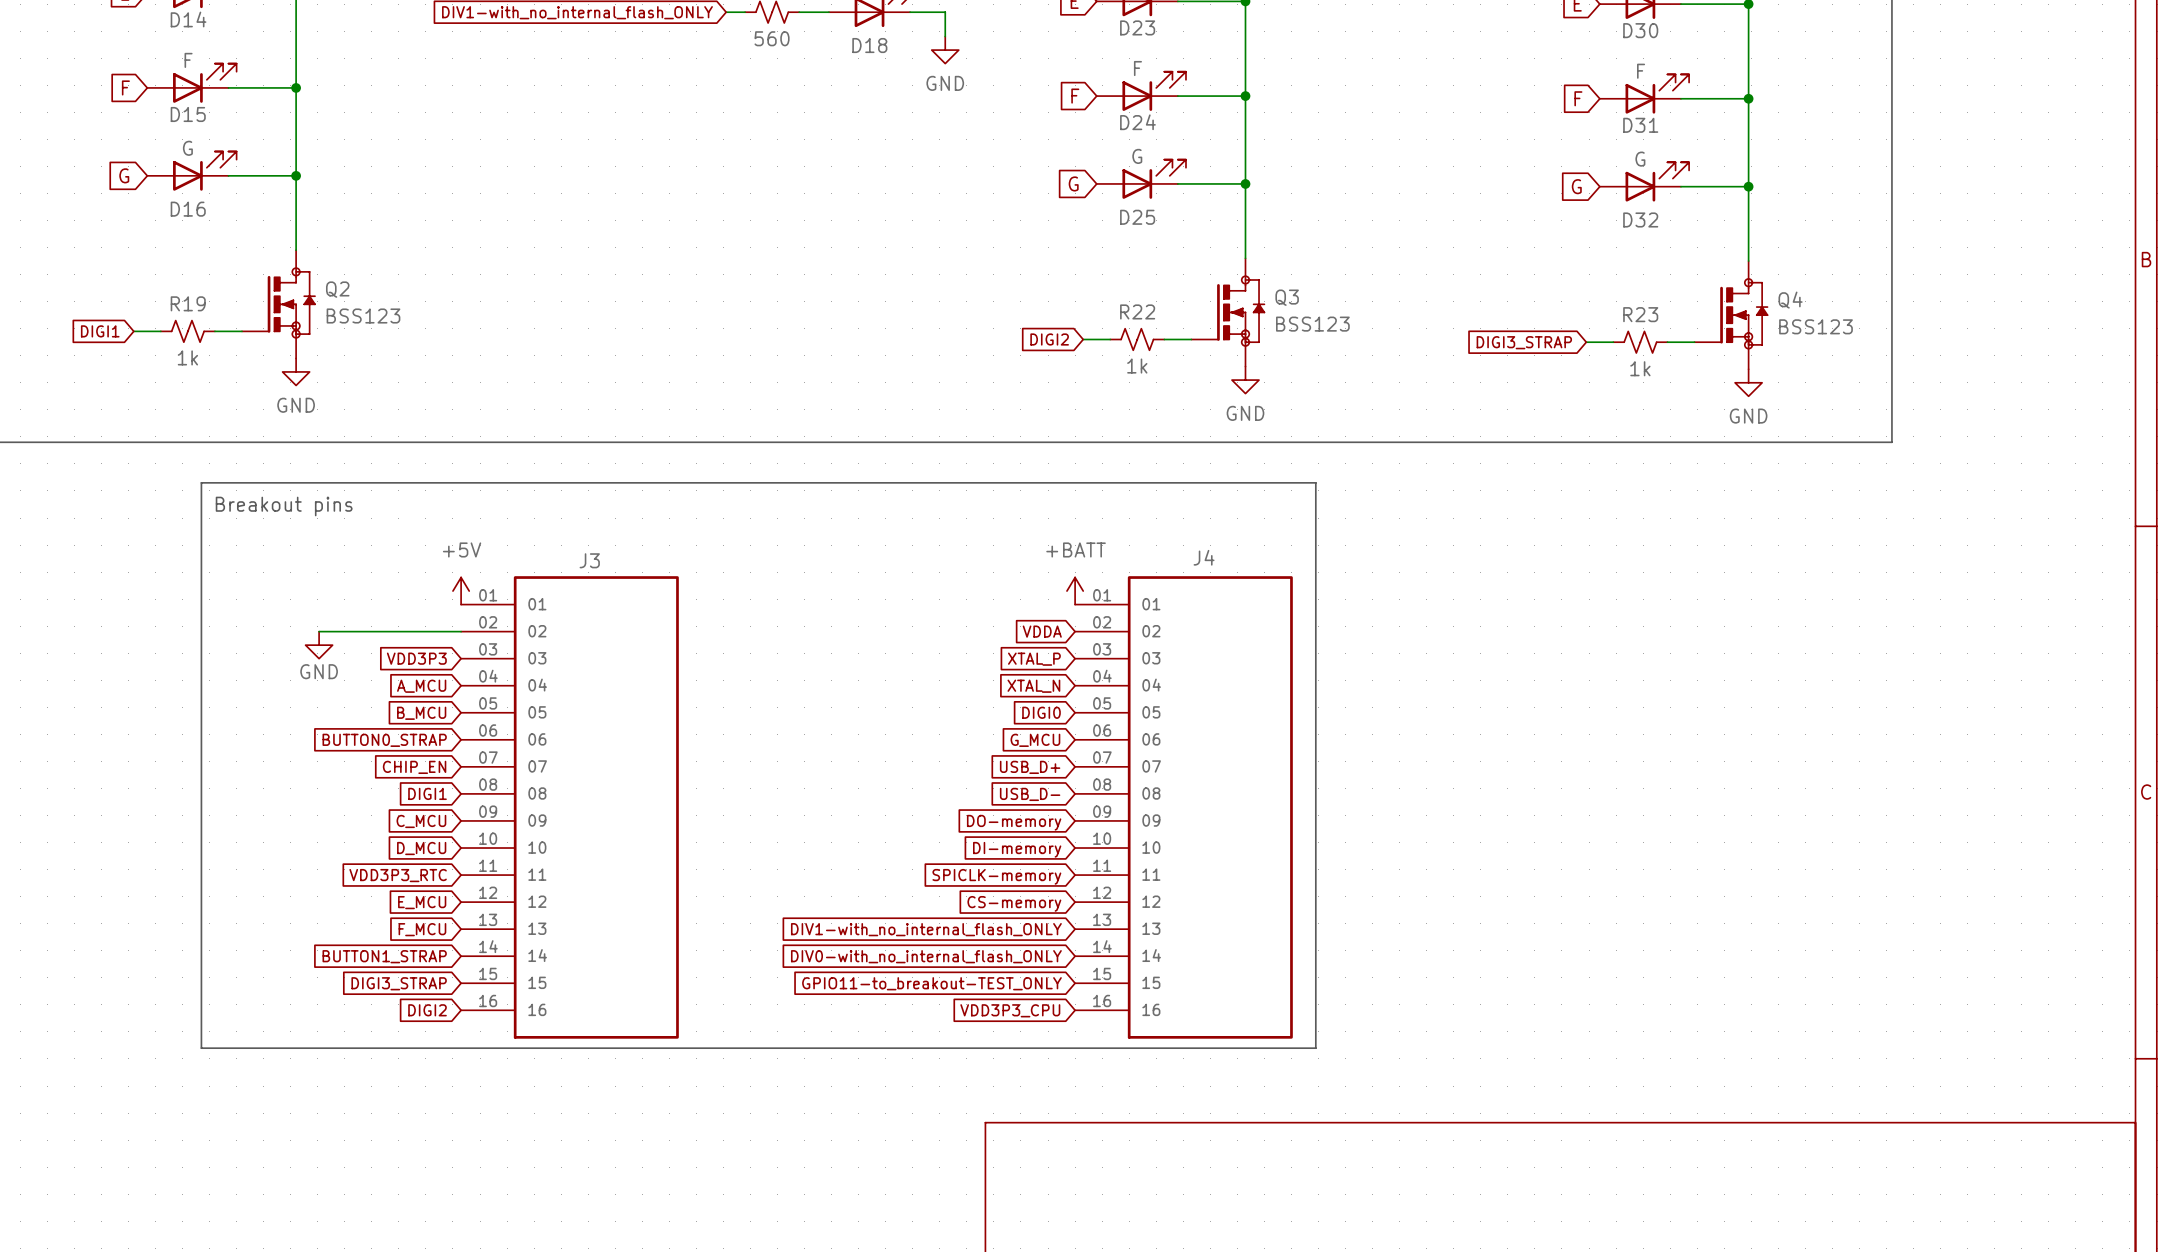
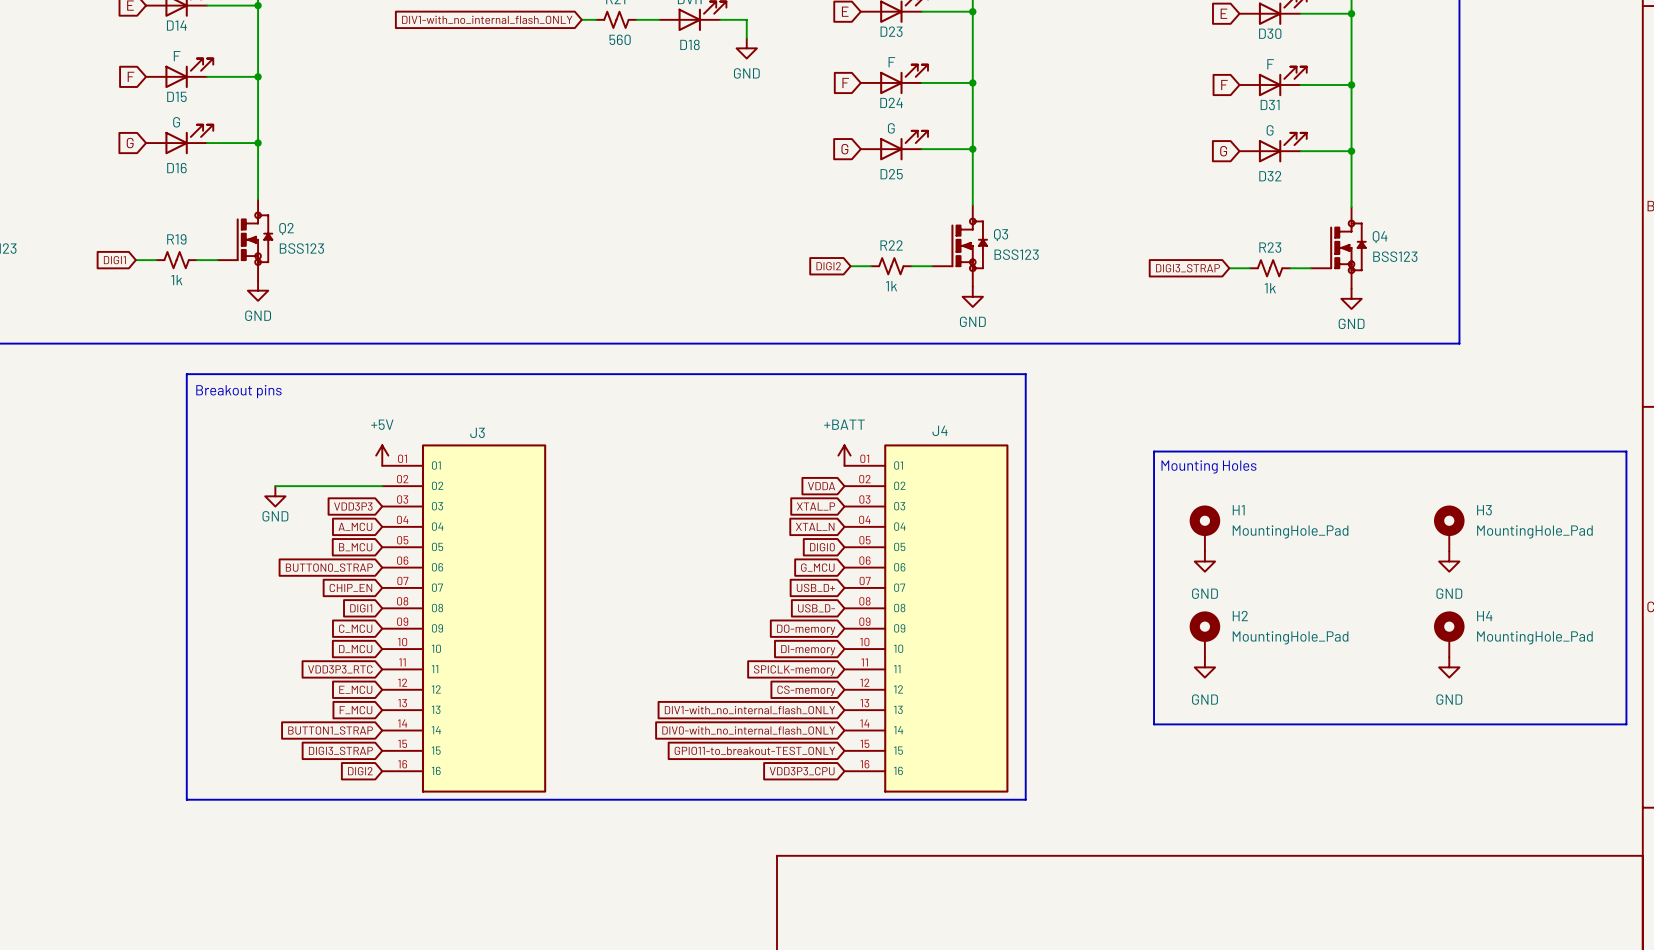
line: none -> (1154, 451) (1154, 724) (1626, 724) (1626, 451) (1154, 451)
text: none -> Mounting Holes (1208, 466)
H1: none -> MountingHole_Pad (1204, 528)
H3: none -> MountingHole_Pad (1449, 528)
power symbol: none -> GND (1204, 561)
power symbol: none -> GND (1449, 561)
H2: none -> MountingHole_Pad (1204, 634)
H4: none -> MountingHole_Pad (1449, 634)
power symbol: none -> GND (1204, 667)
power symbol: none -> GND (1449, 667)

